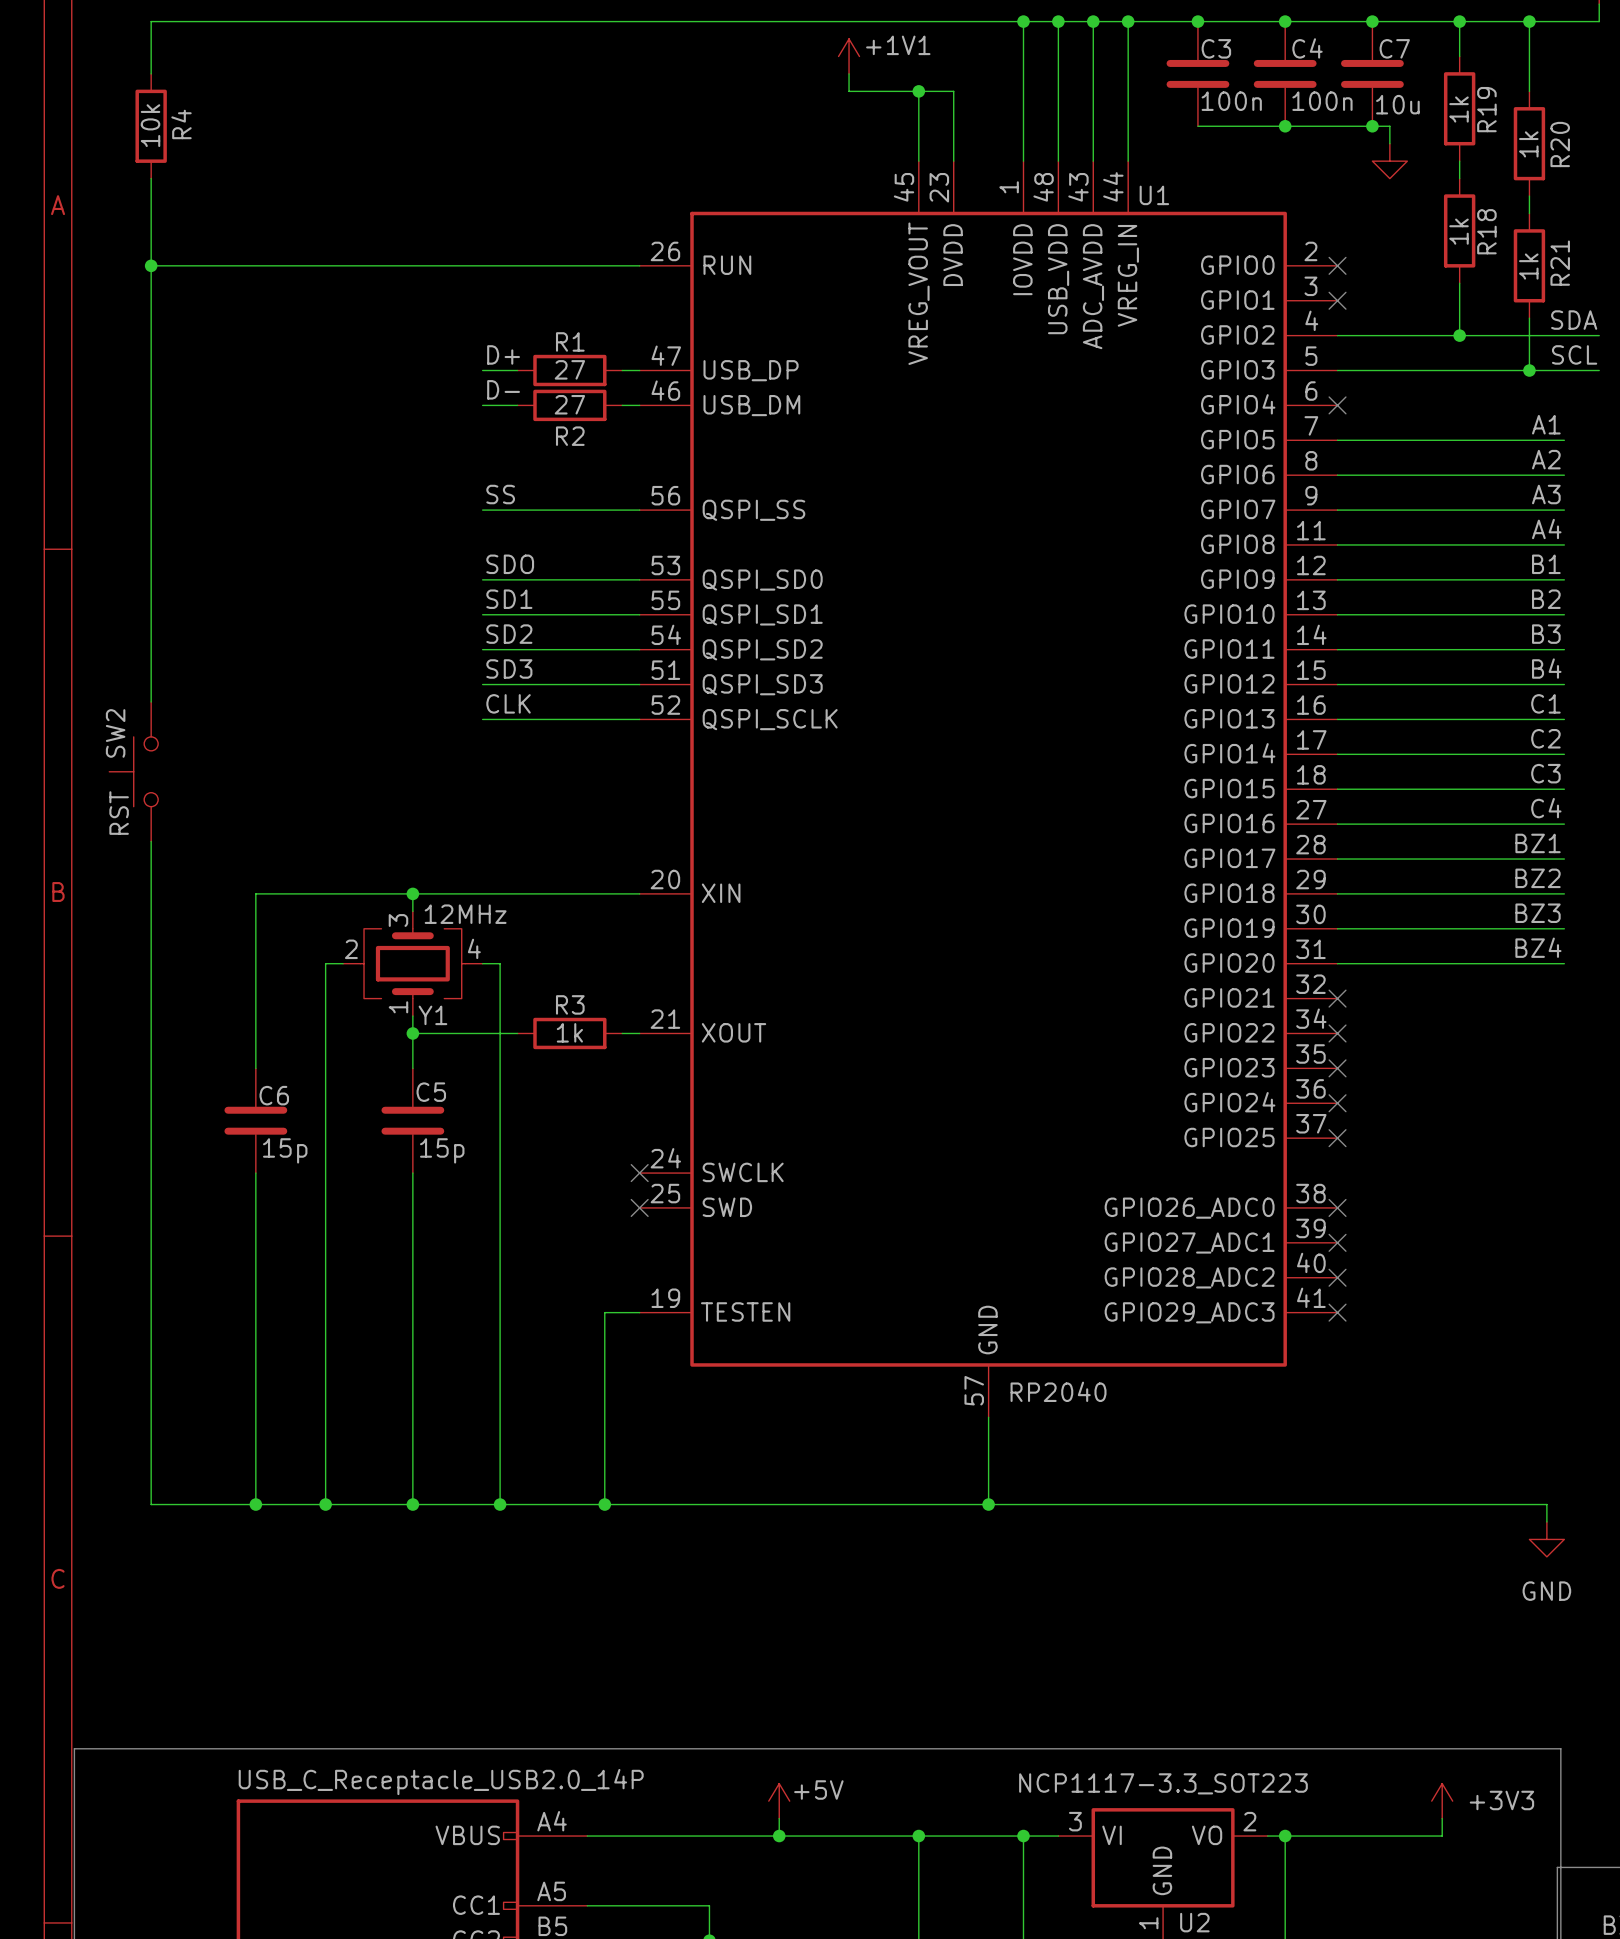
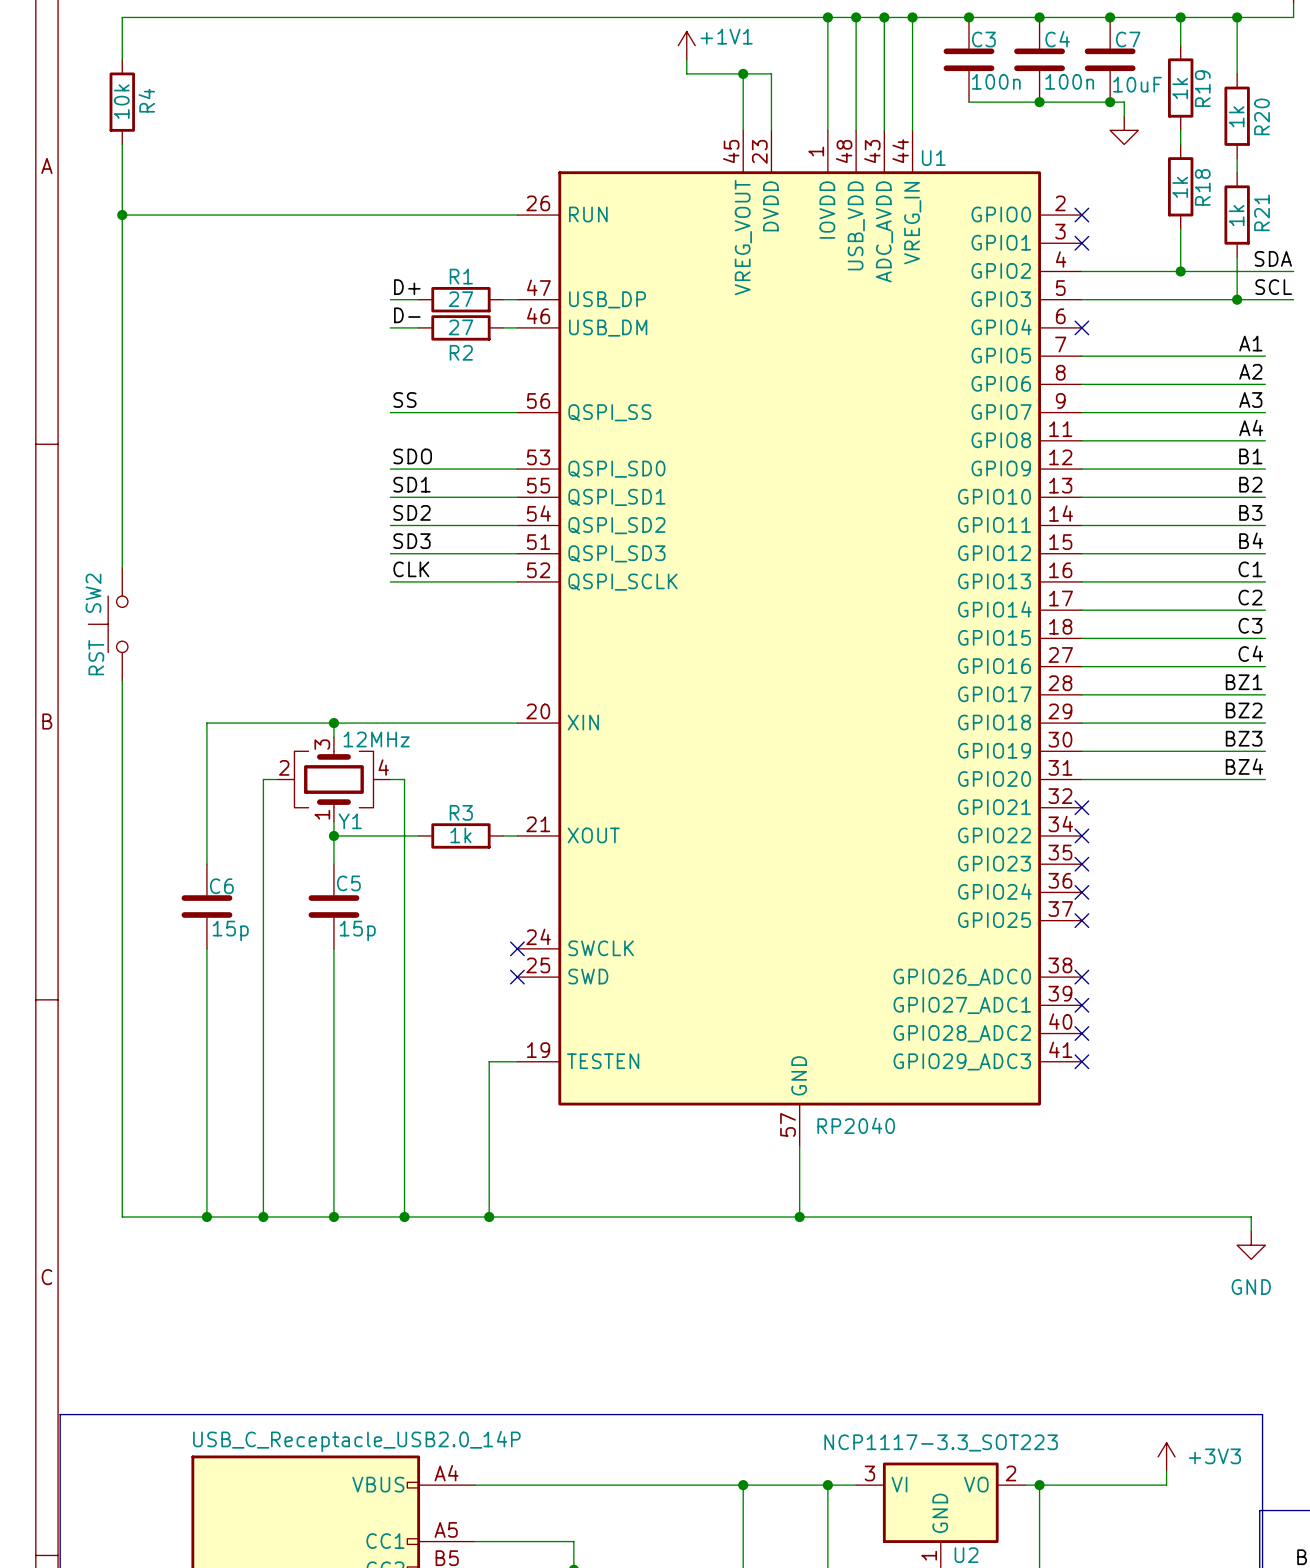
C7 value: 10u (1397, 104) -> 10uF (1137, 84)
power symbol: +5V (779, 1801) -> none
wire: (779, 1818) (779, 1836) -> none
junction: (779, 1836) -> none

